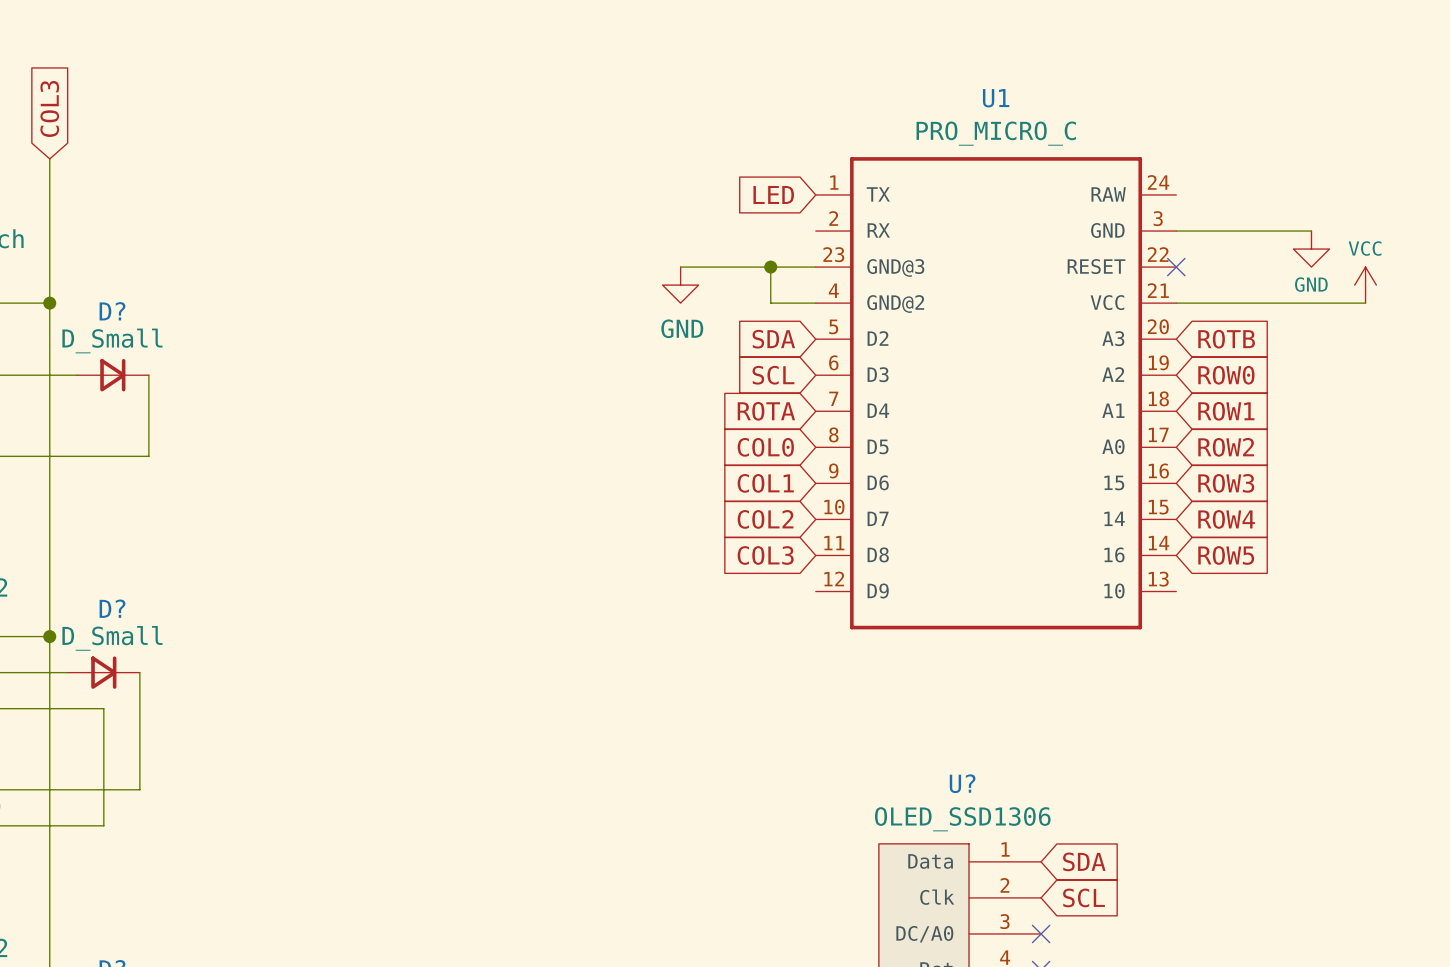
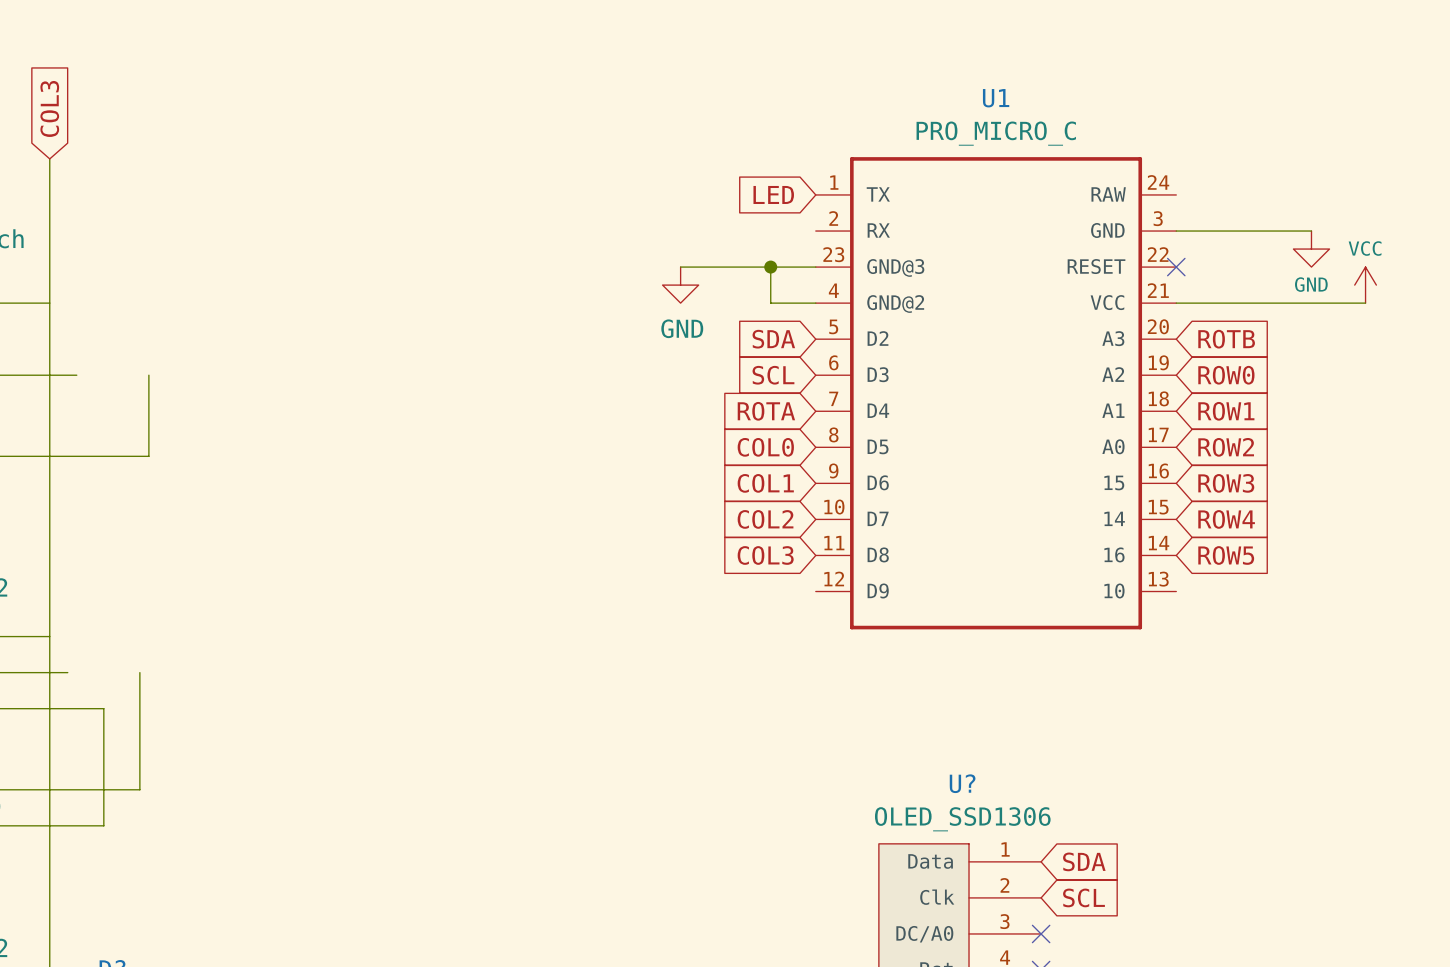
junction: (49, 303) -> none
D?: D_Small (112, 375) -> none
junction: (49, 636) -> none
D?: D_Small (103, 672) -> none

